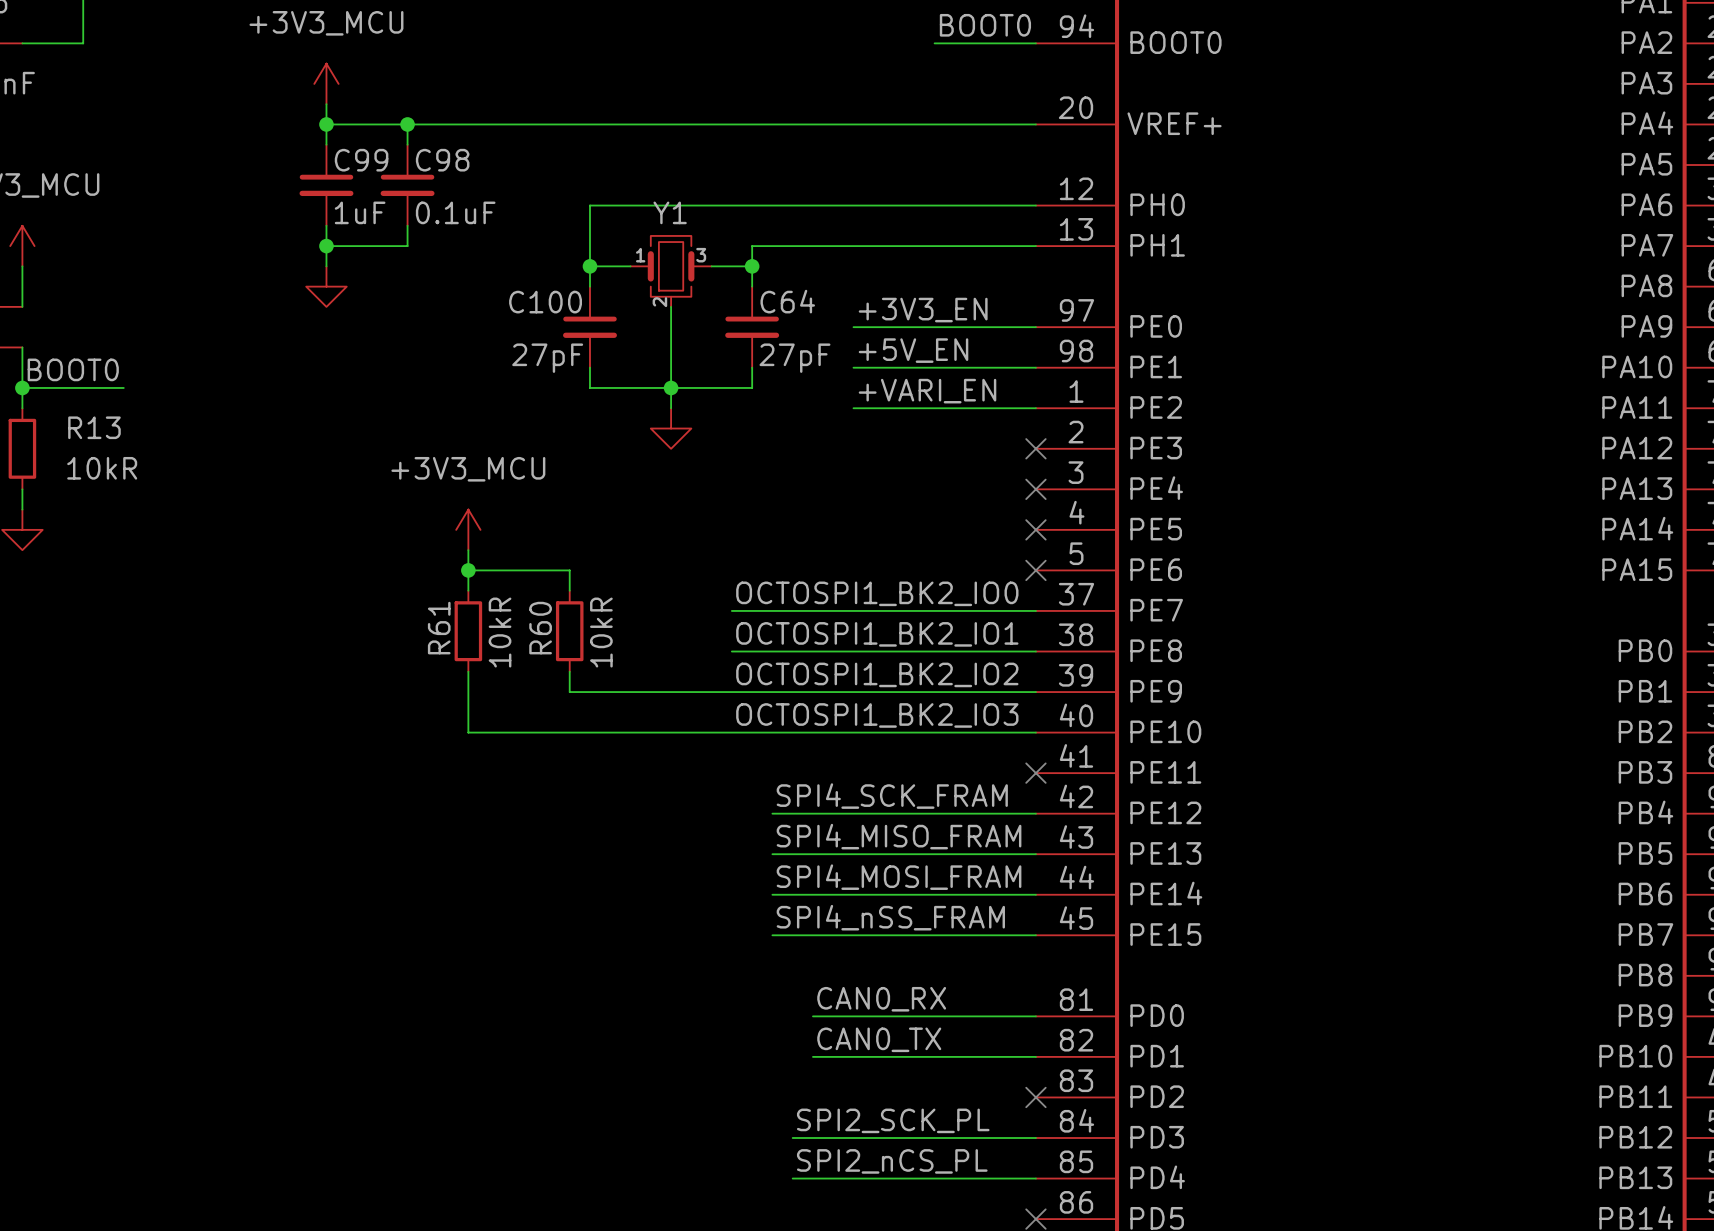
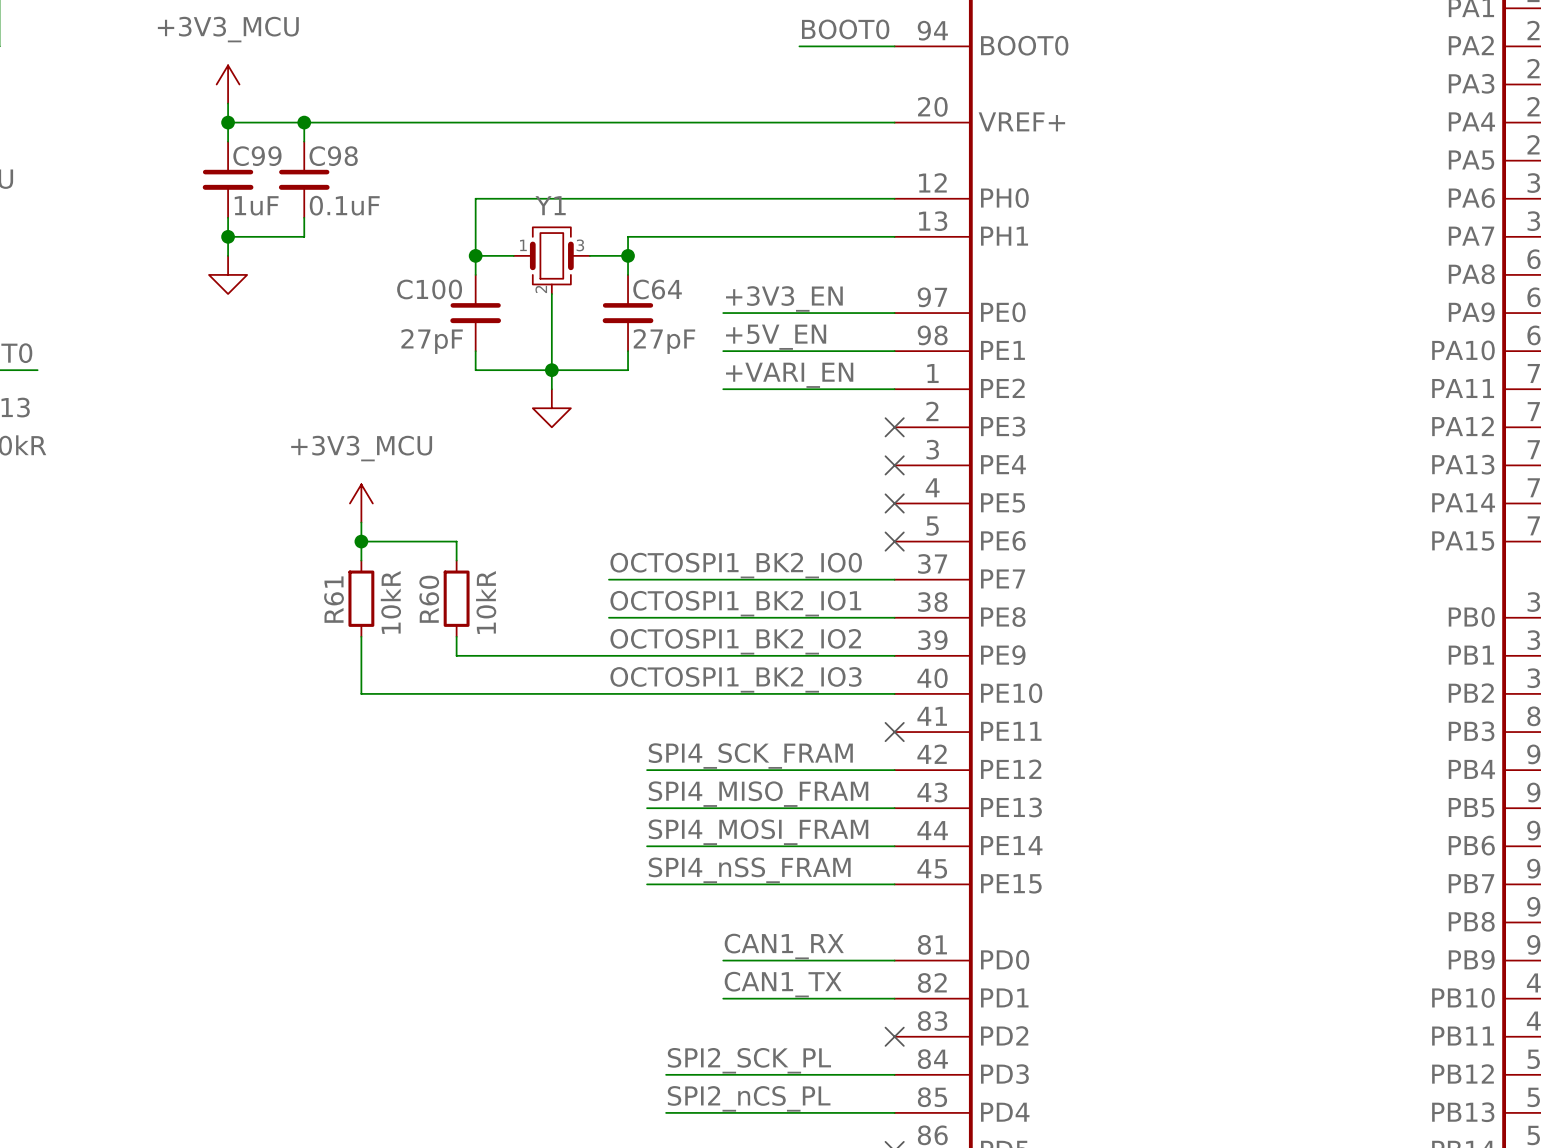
label: CAN0_RX (881, 999) -> none
label: none -> CAN1_RX (784, 946)
wire: (812, 1016) (853, 1016) -> none
label: CAN0_TX (879, 1039) -> none
label: none -> CAN1_TX (783, 984)
wire: (812, 1056) (853, 1056) -> none

